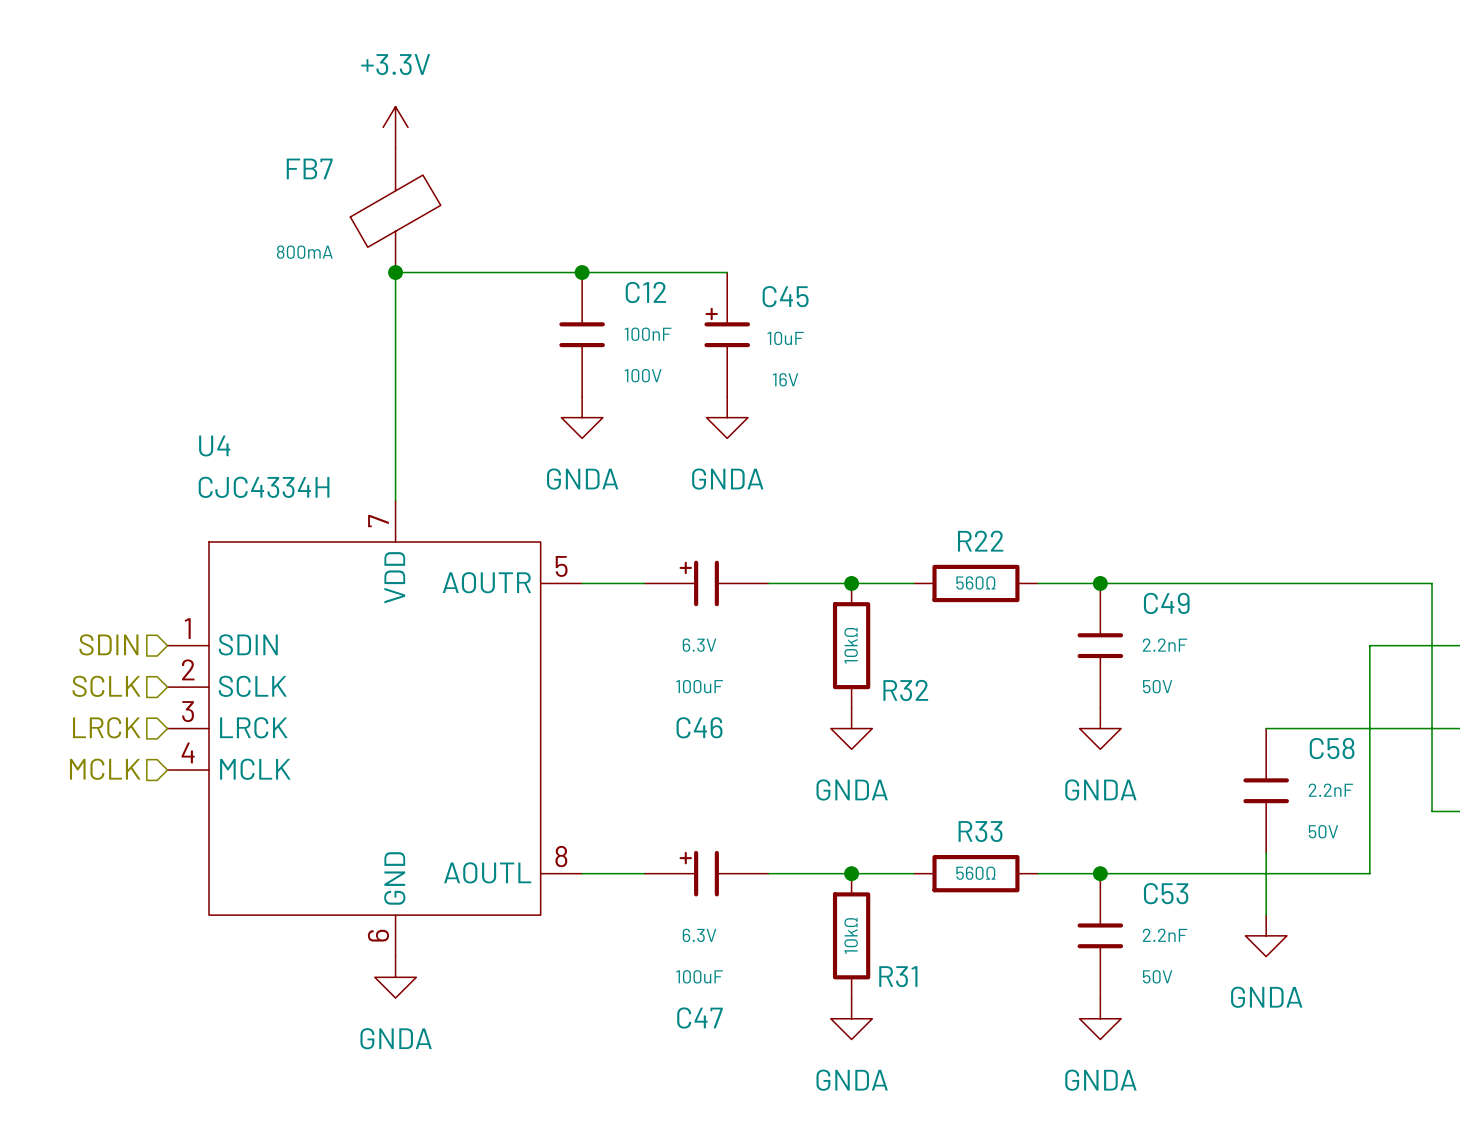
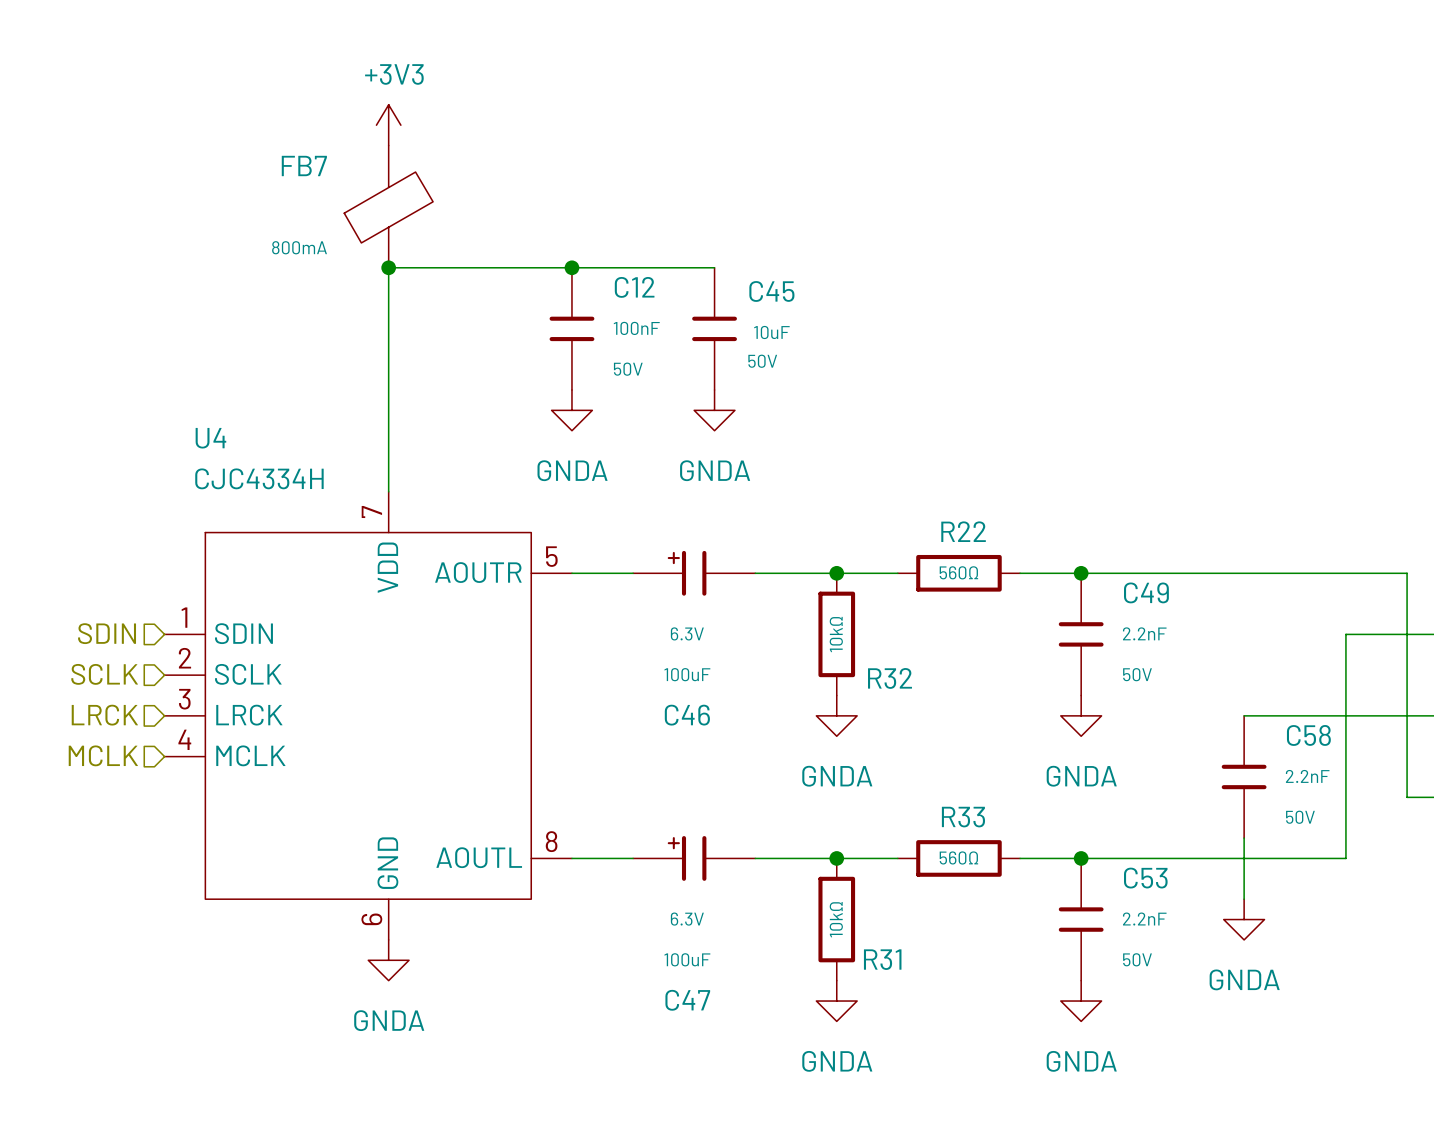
power symbol: +3.3V (395, 127) -> +3V3 (388, 125)
C45 symbol: [704, 272, 751, 397] -> [692, 267, 737, 390]
C45 text: none -> 50V (762, 361)
C12 text: 100V (643, 375) -> 50V (628, 369)
C45 text: 16V (785, 379) -> none

